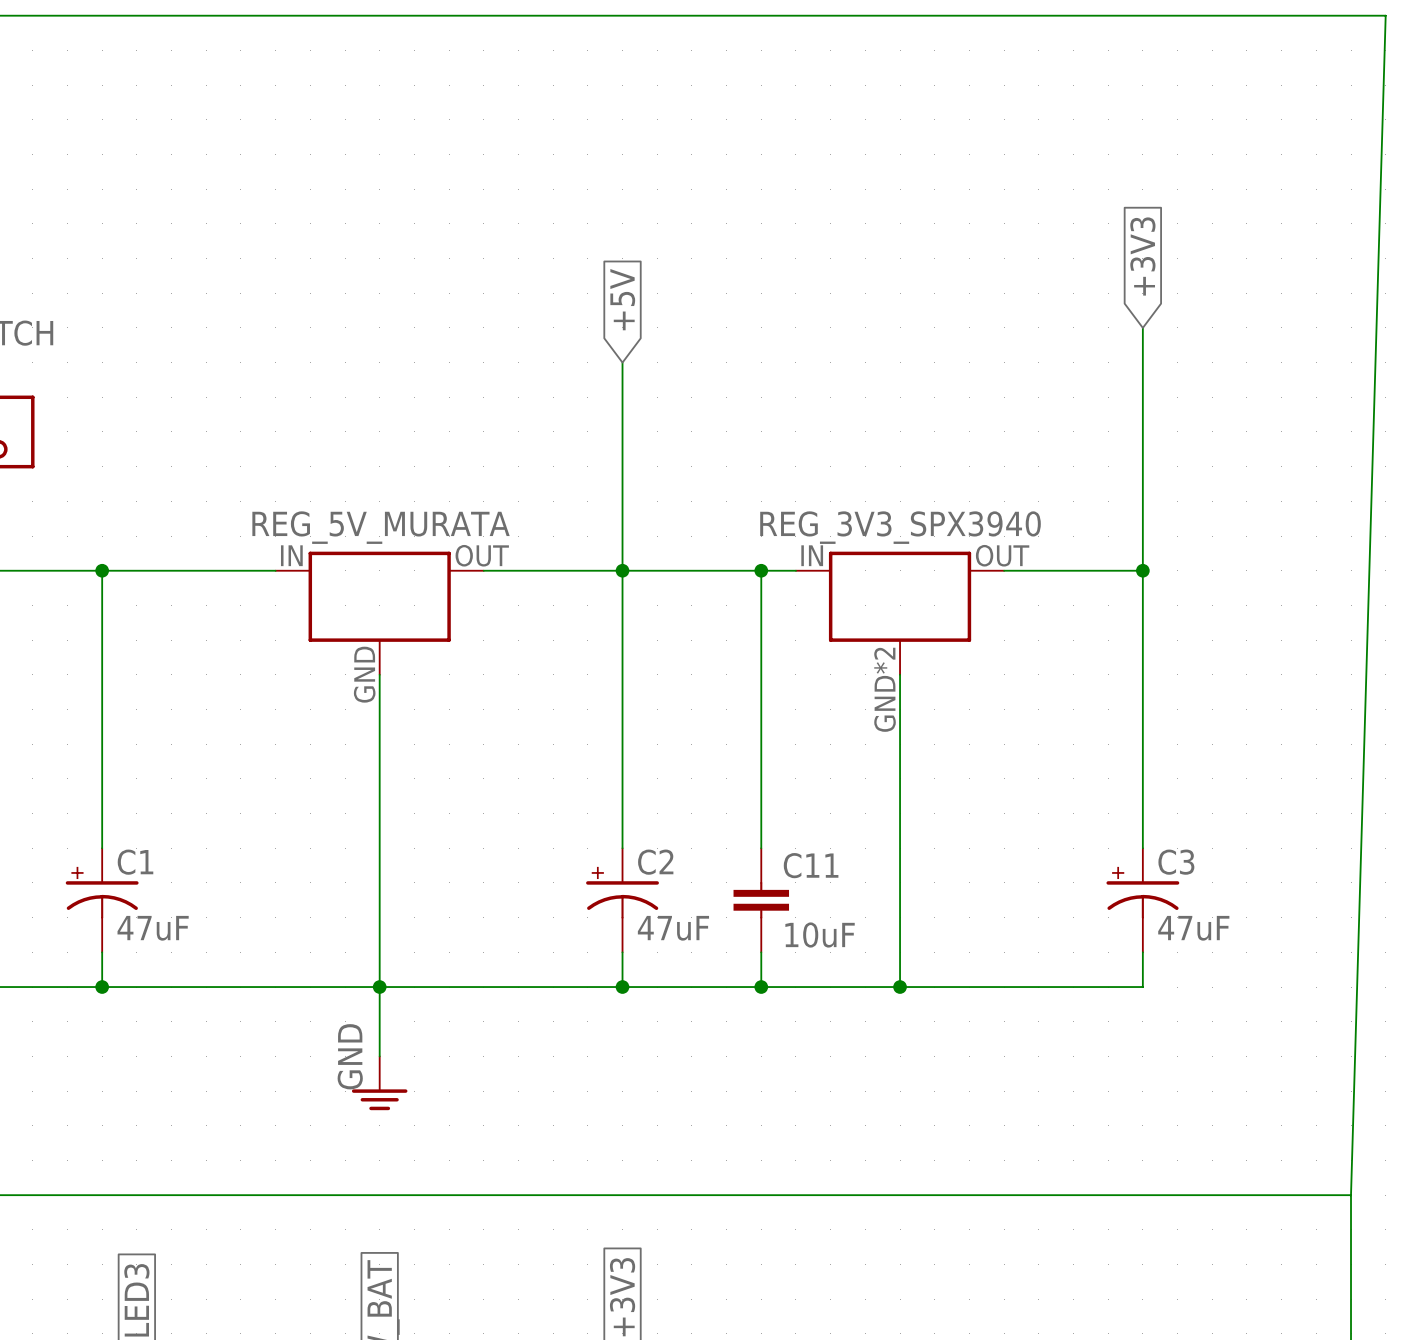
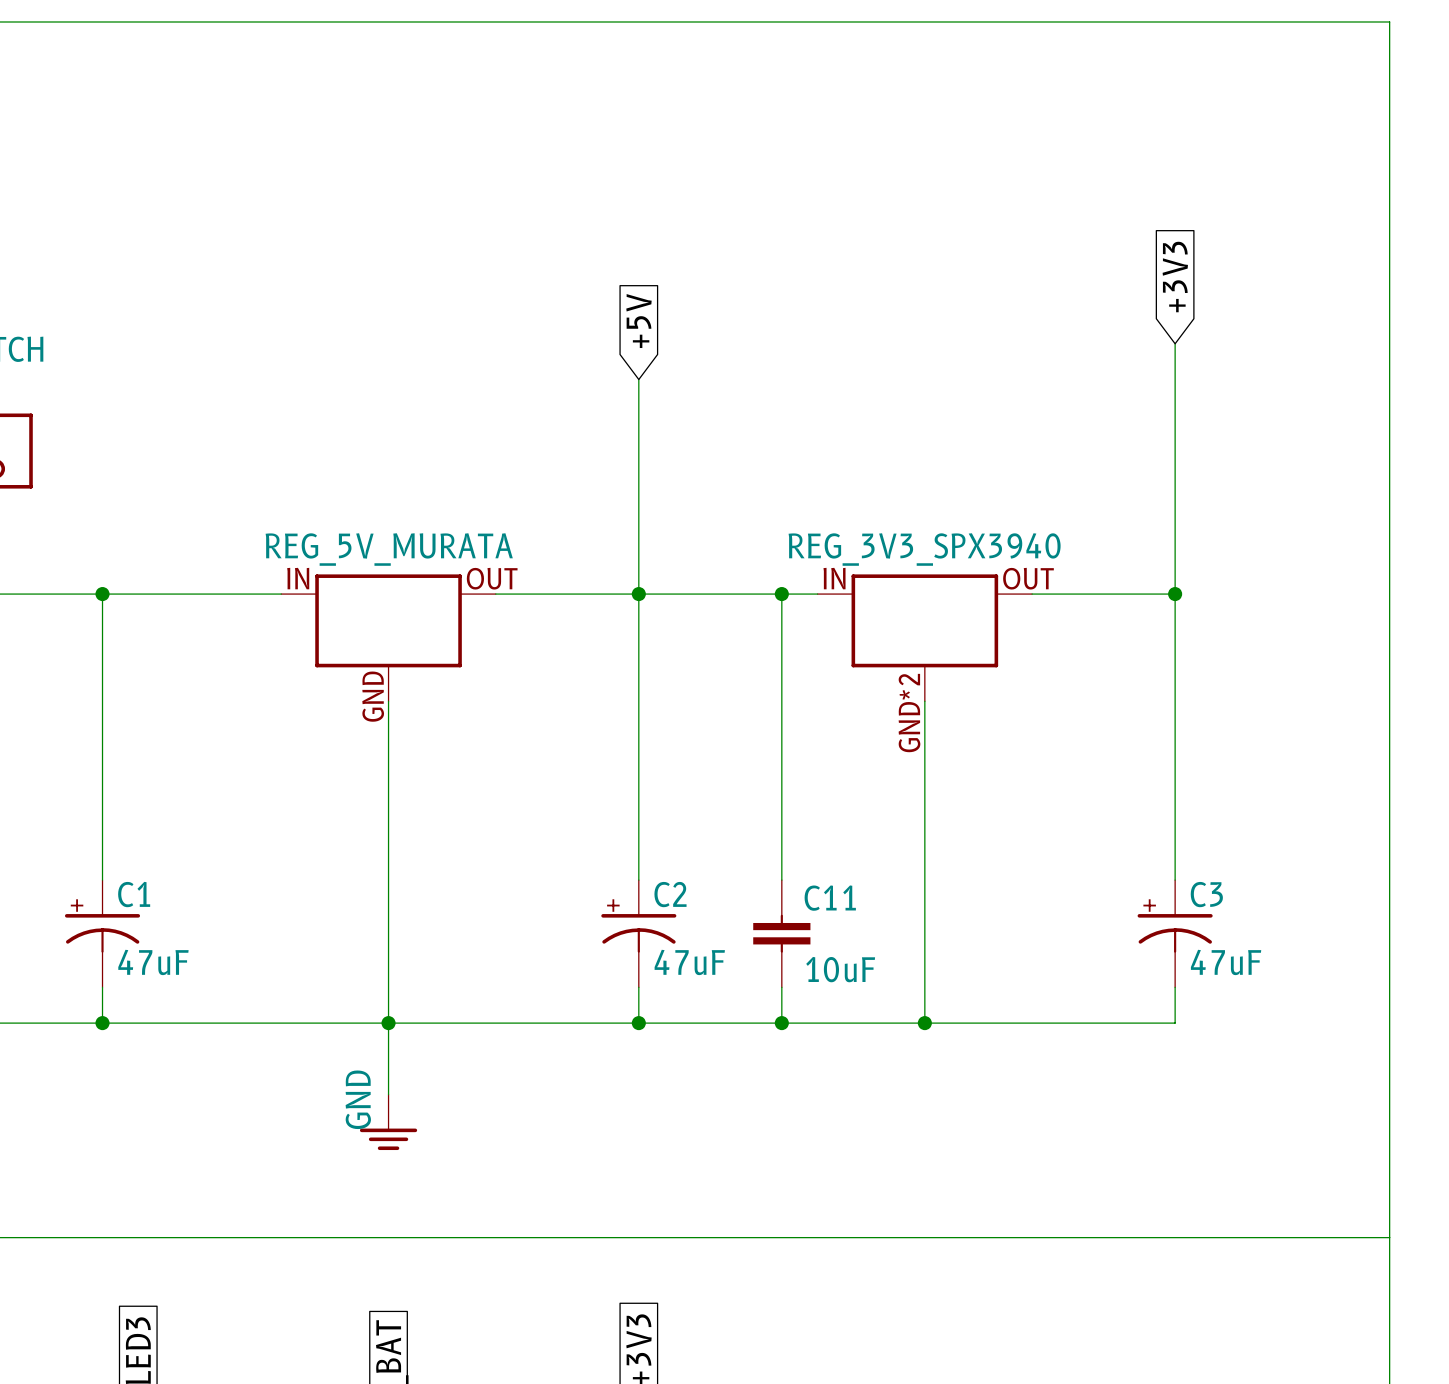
wire: (1351, 15) (1385, 15) (1351, 1195) -> (1389, 21) (1389, 1237)

